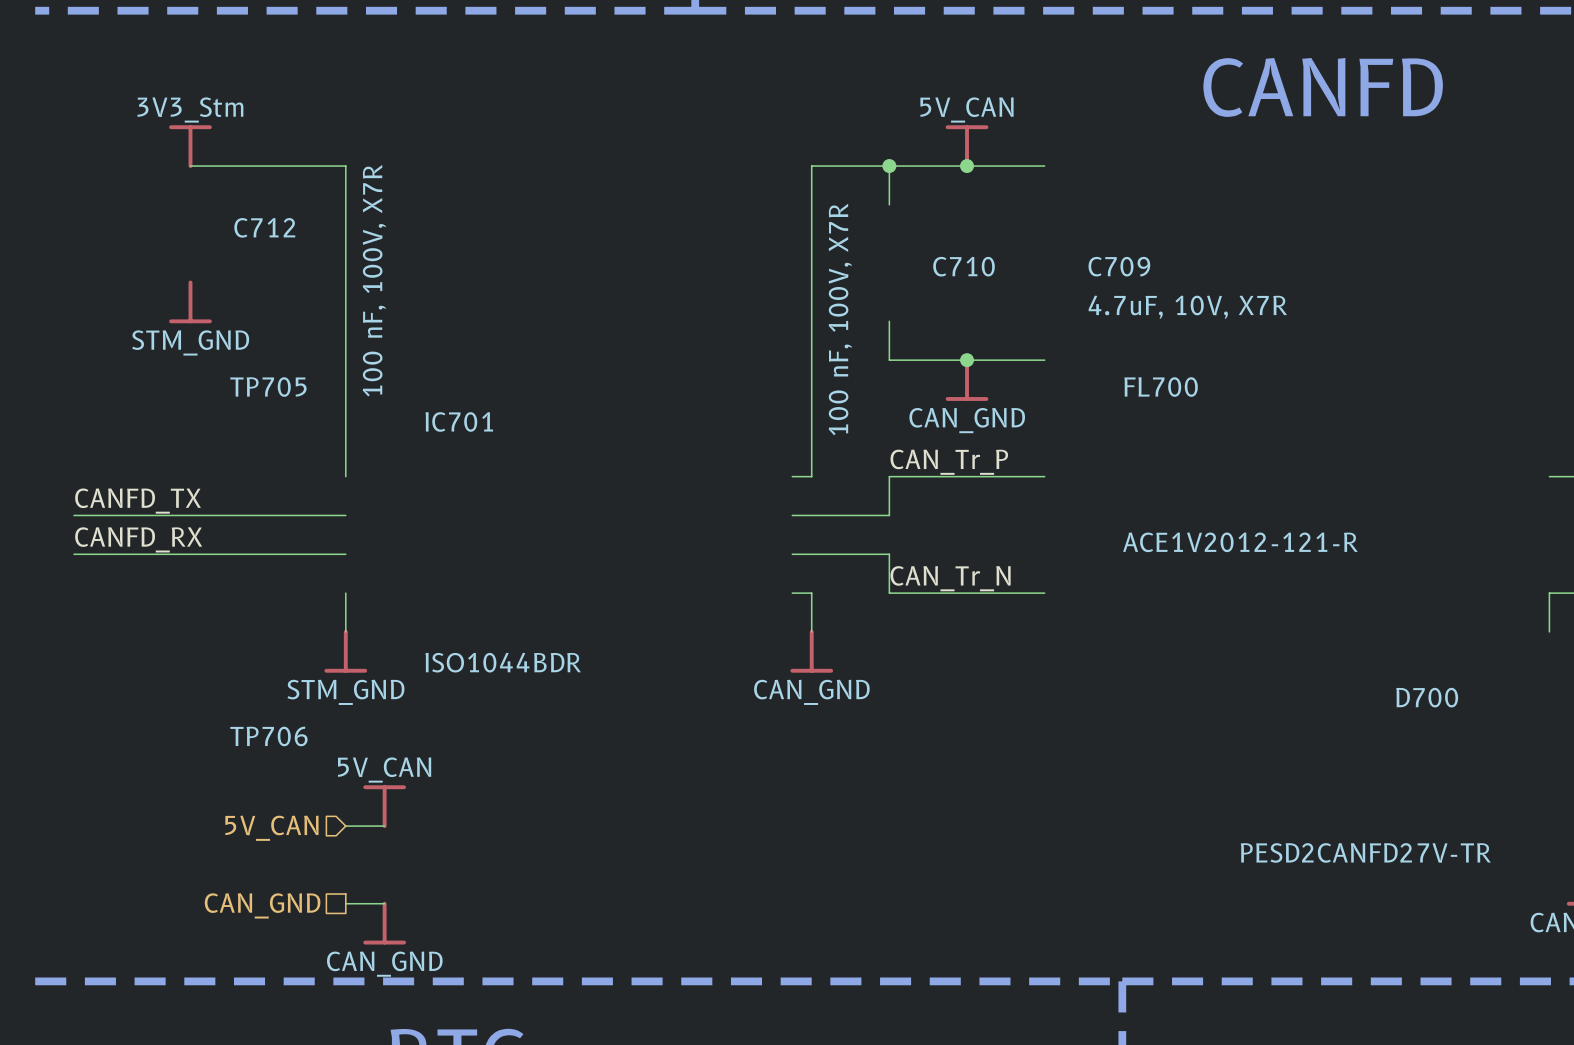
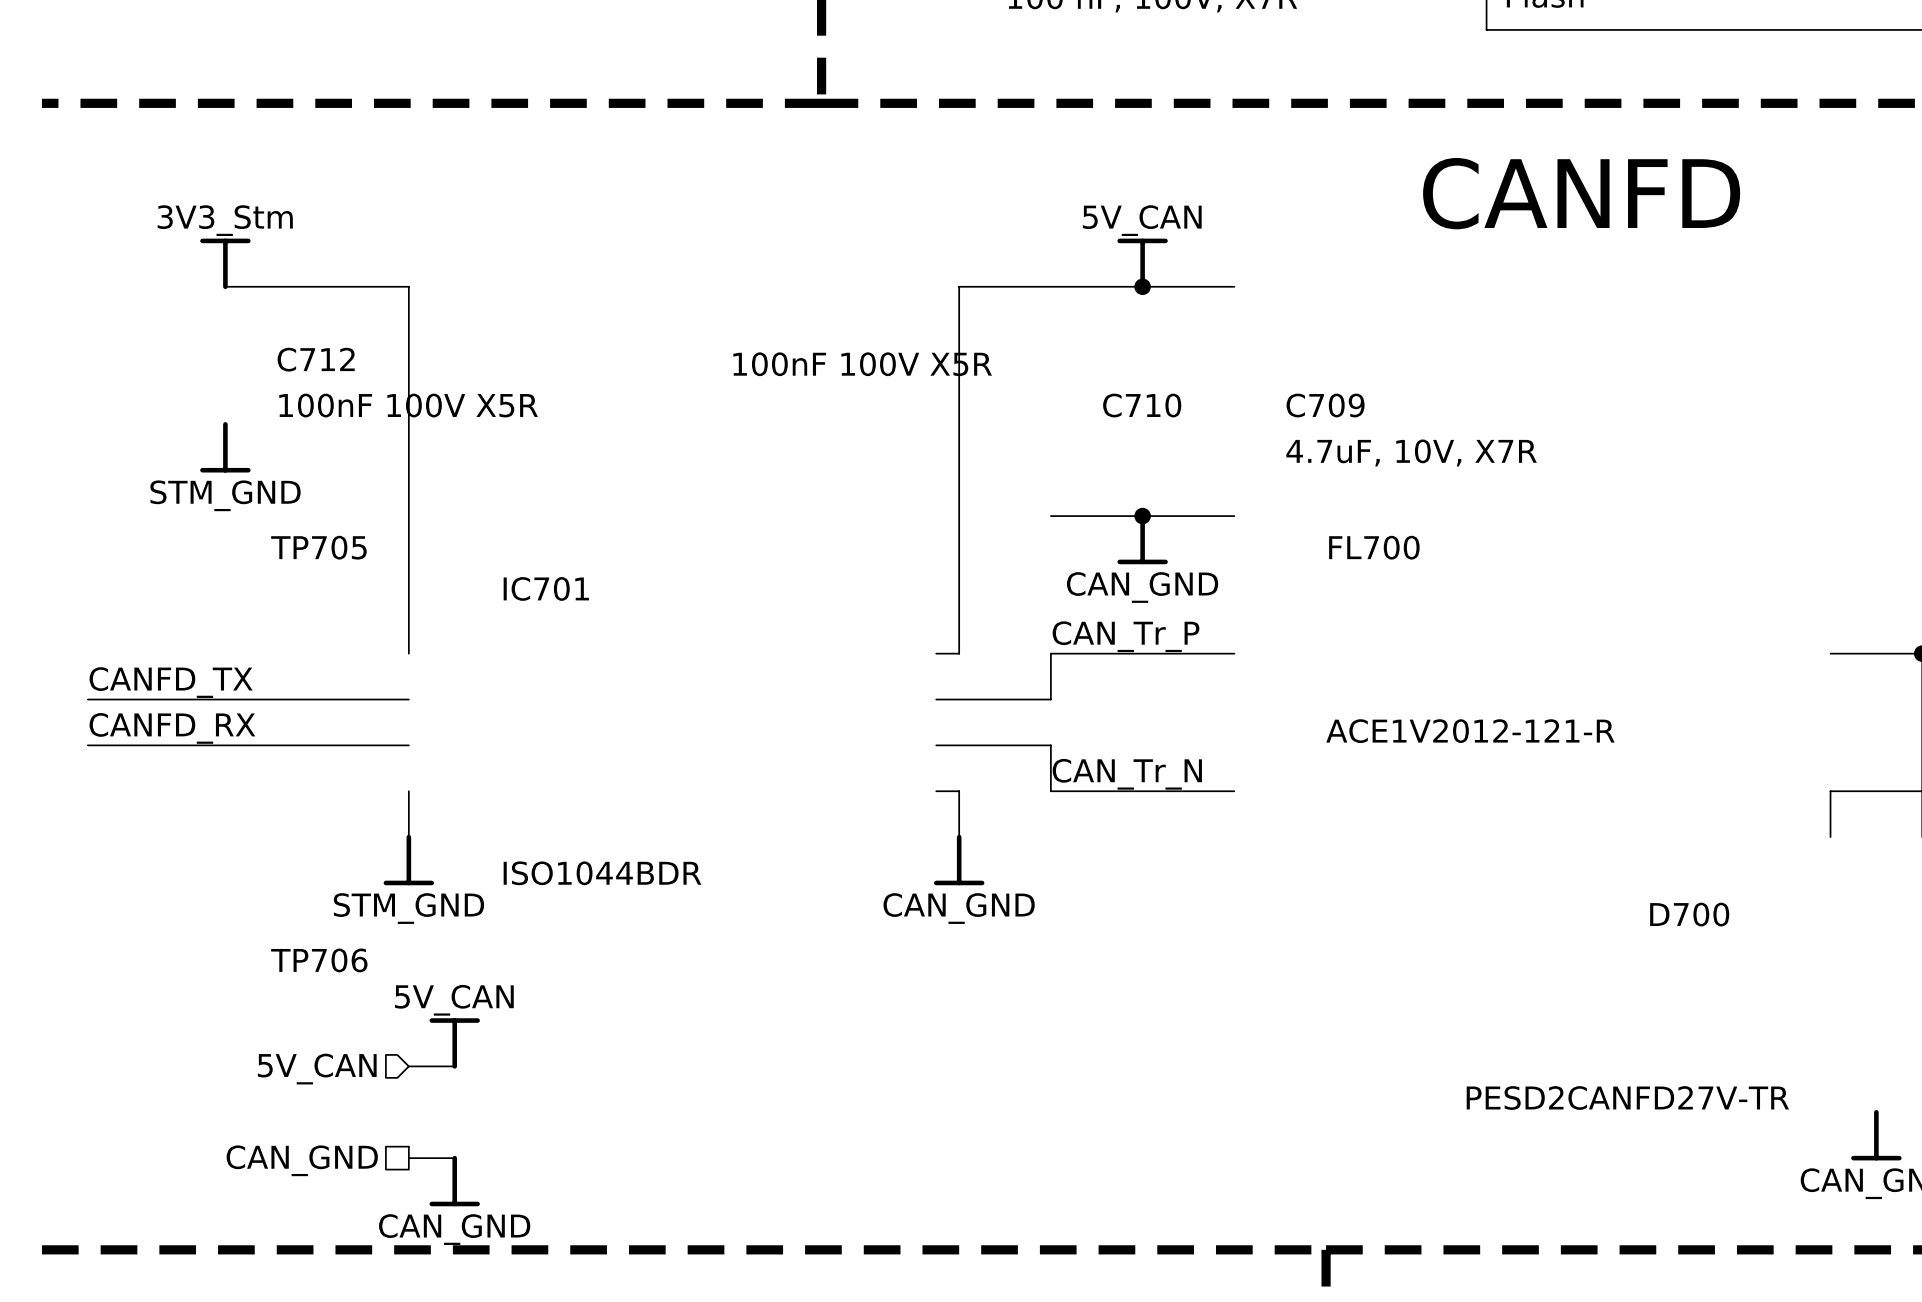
wire: (889, 166) (889, 204) -> none
junction: (889, 166) -> none
C712 position: (310, 280) -> (407, 382)
C712 value: 100 nF, 100V, X7R (374, 280) -> 100nF 100V X5R (408, 405)
C710 value: 100 nF, 100V, X7R (840, 319) -> 100nF 100V X5R (862, 364)
C710 position: (911, 319) -> (957, 384)
wire: (889, 321) (889, 360) -> none

